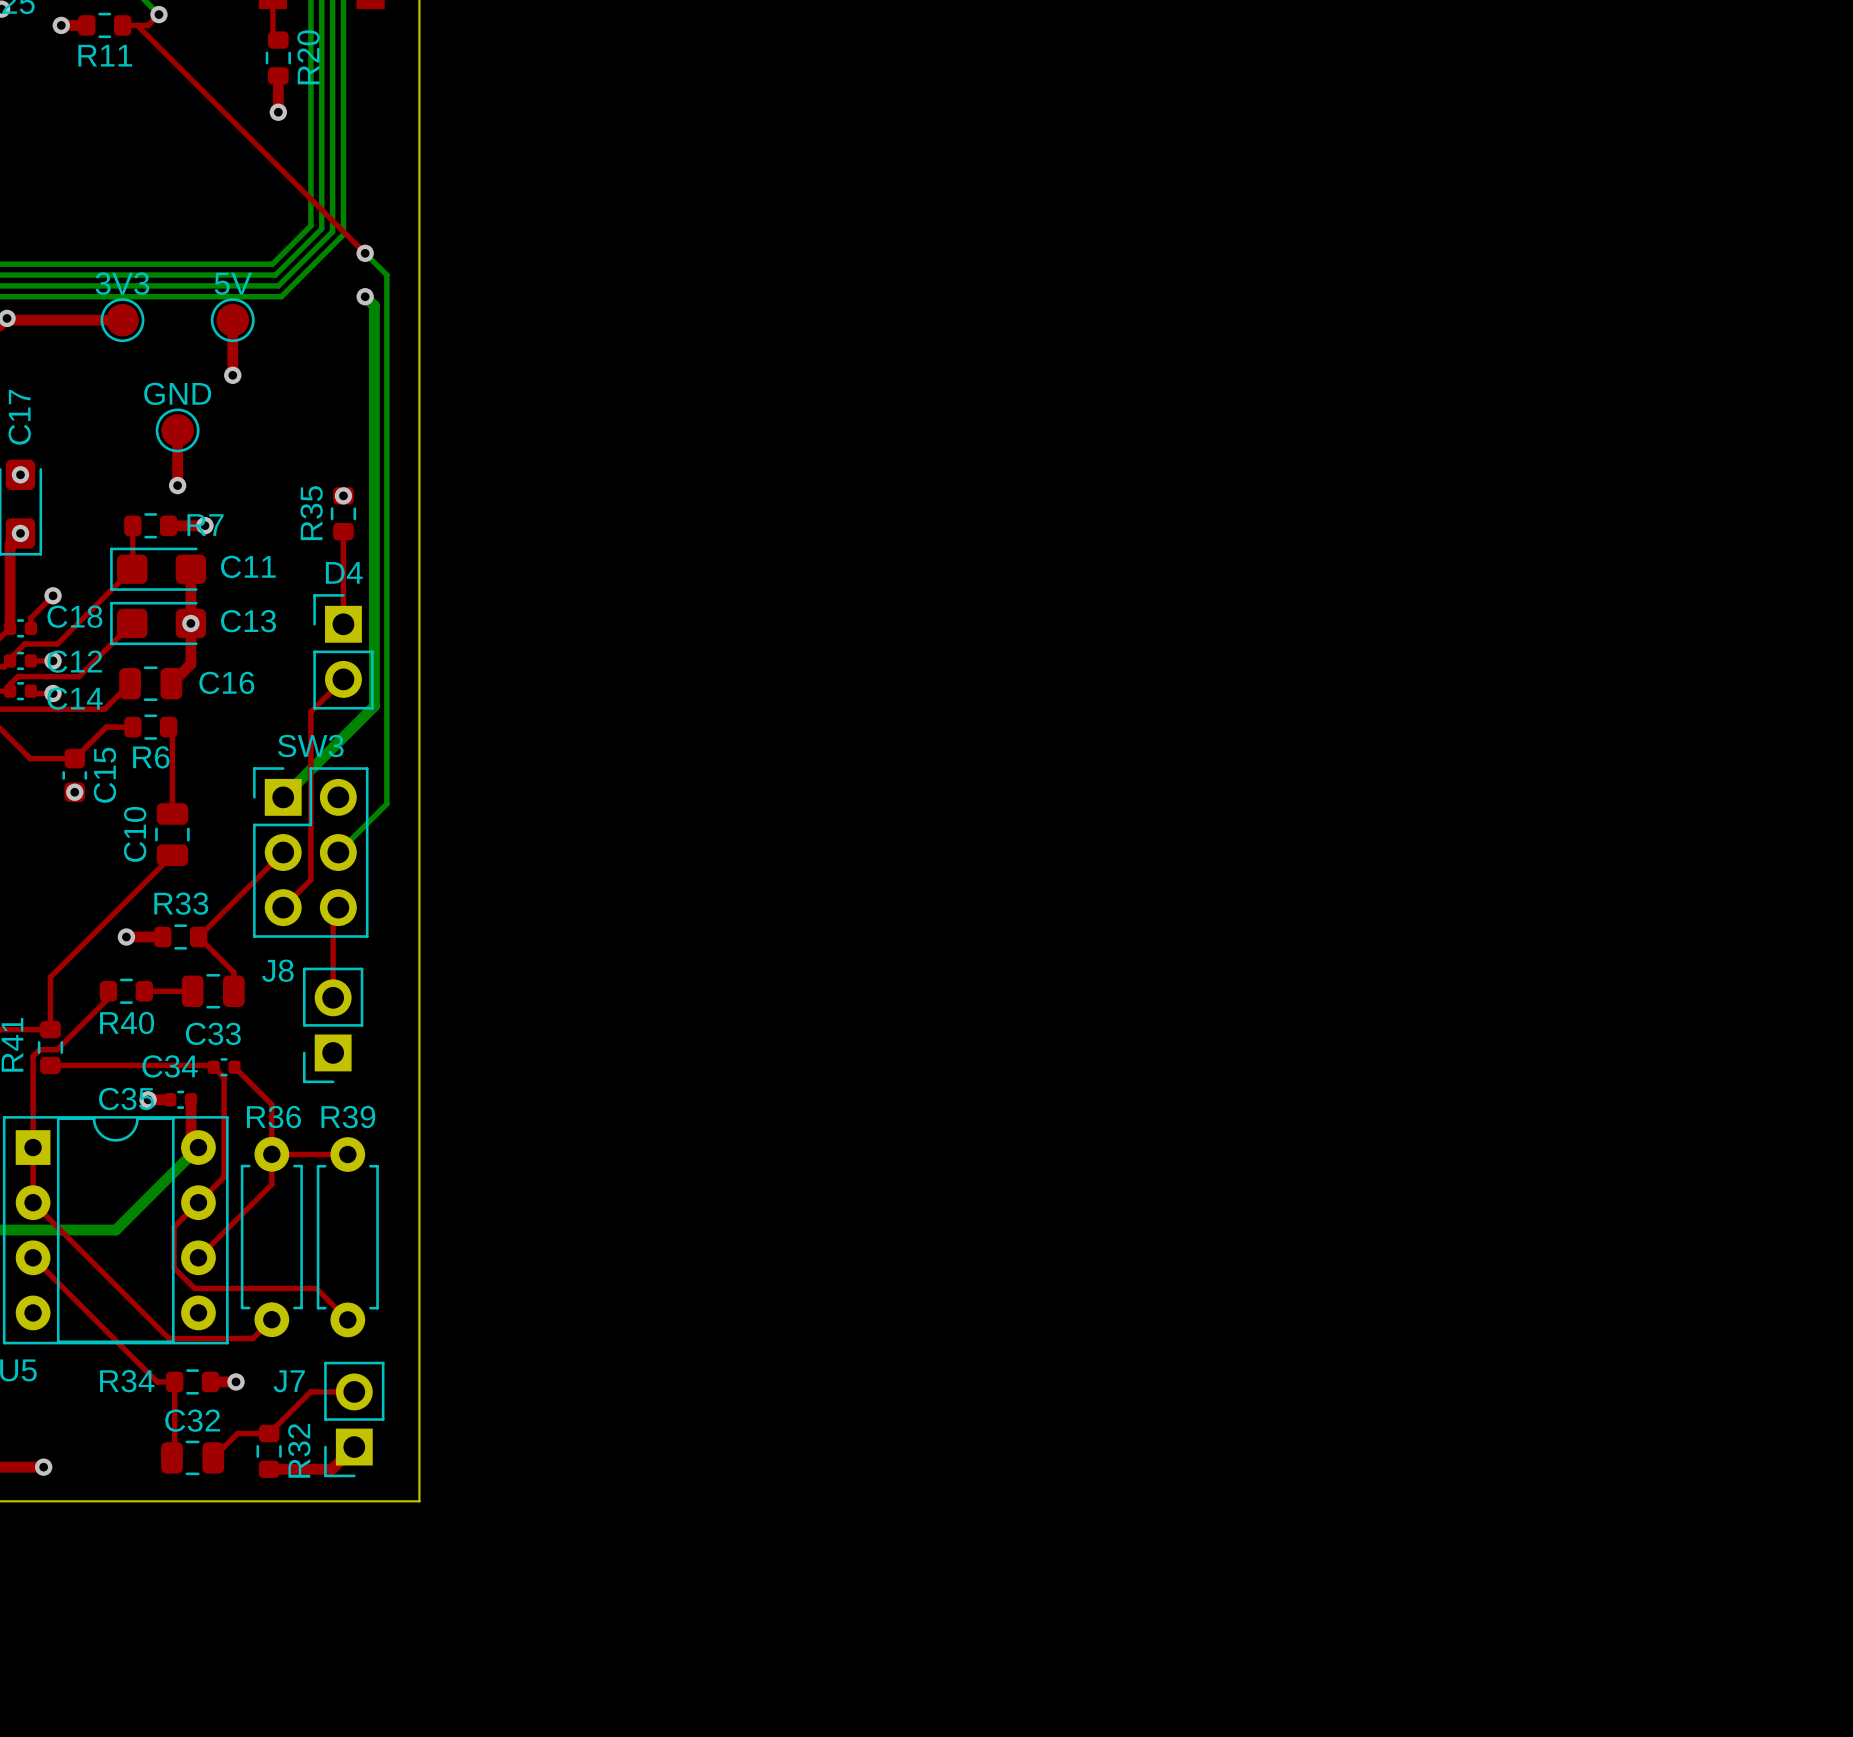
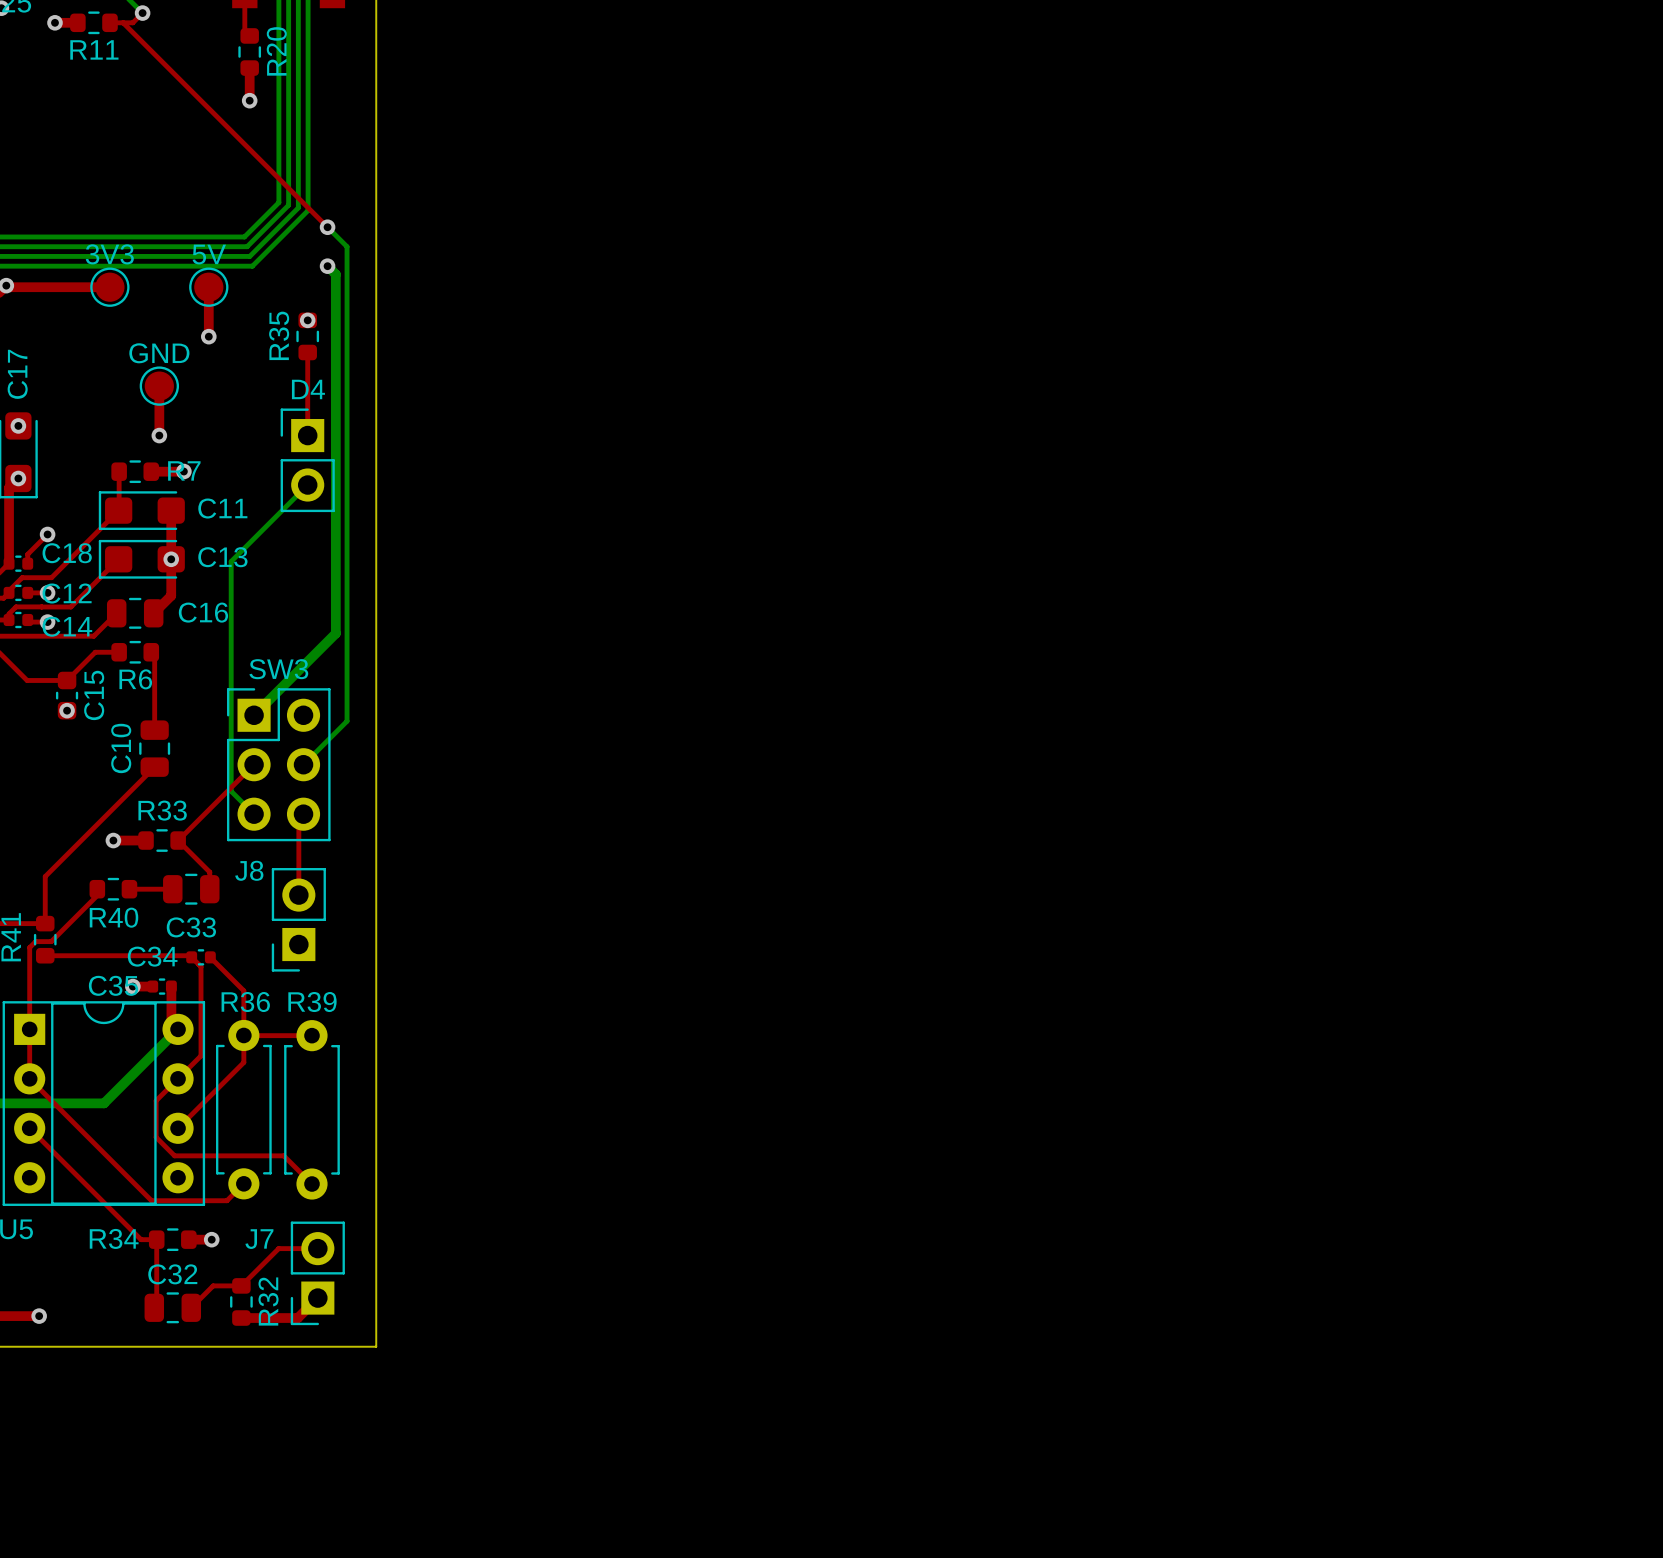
via: none -> (307, 320)
via: (343, 495) -> none
R35 position: (343, 513) -> (307, 336)
top track: (343, 531) (343, 624) -> (307, 352) (307, 435)
bottom track: none -> (307, 485) (231, 561) (231, 791) (254, 814)
D4 position: (343, 651) -> (307, 460)
top track: (343, 679) (310, 711) (310, 879) (283, 907) -> none

